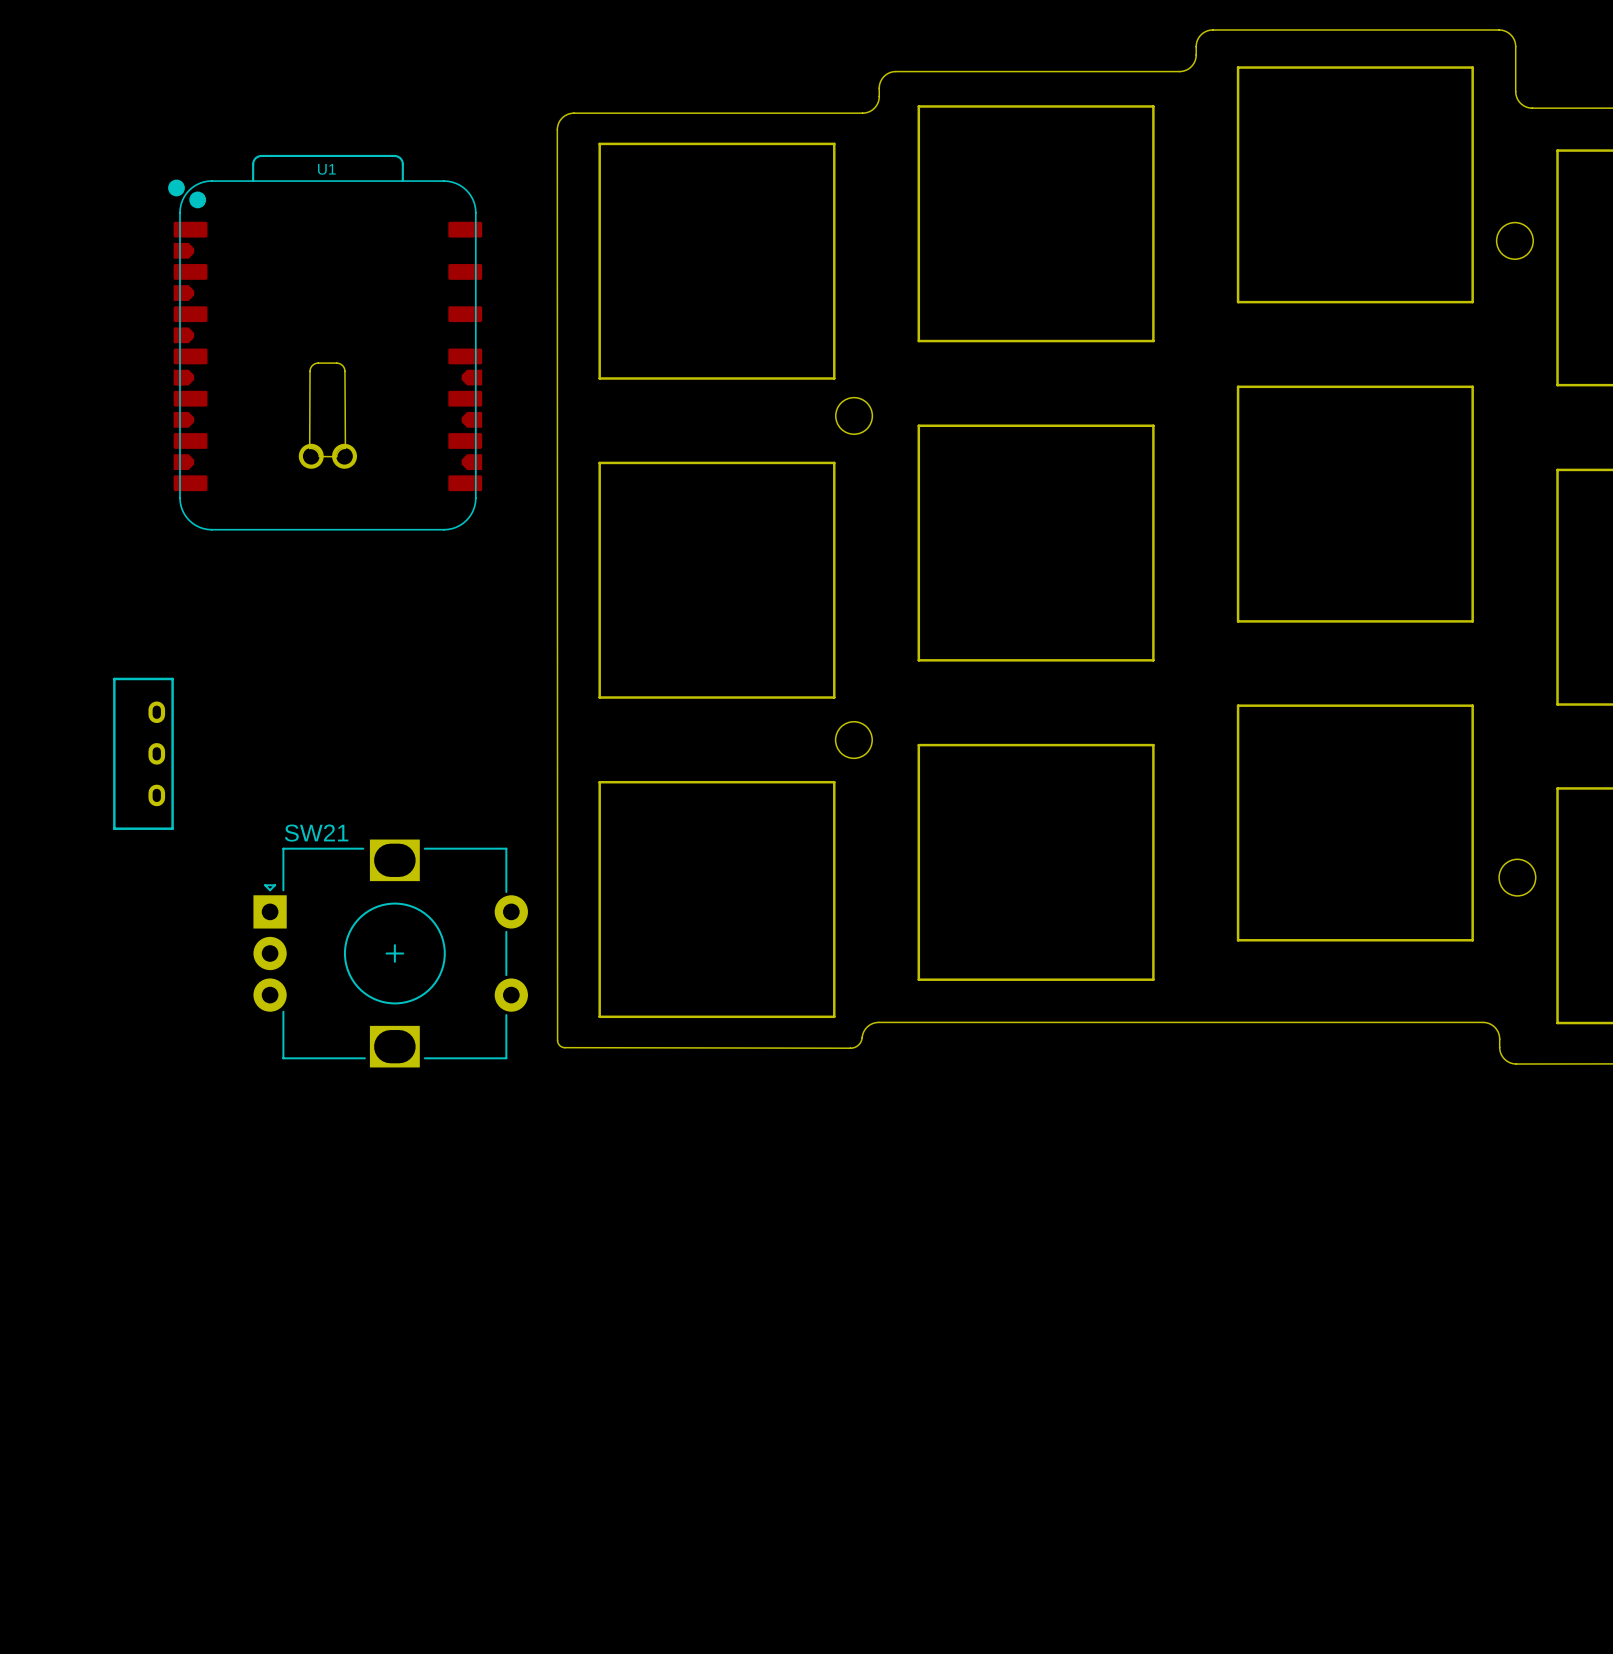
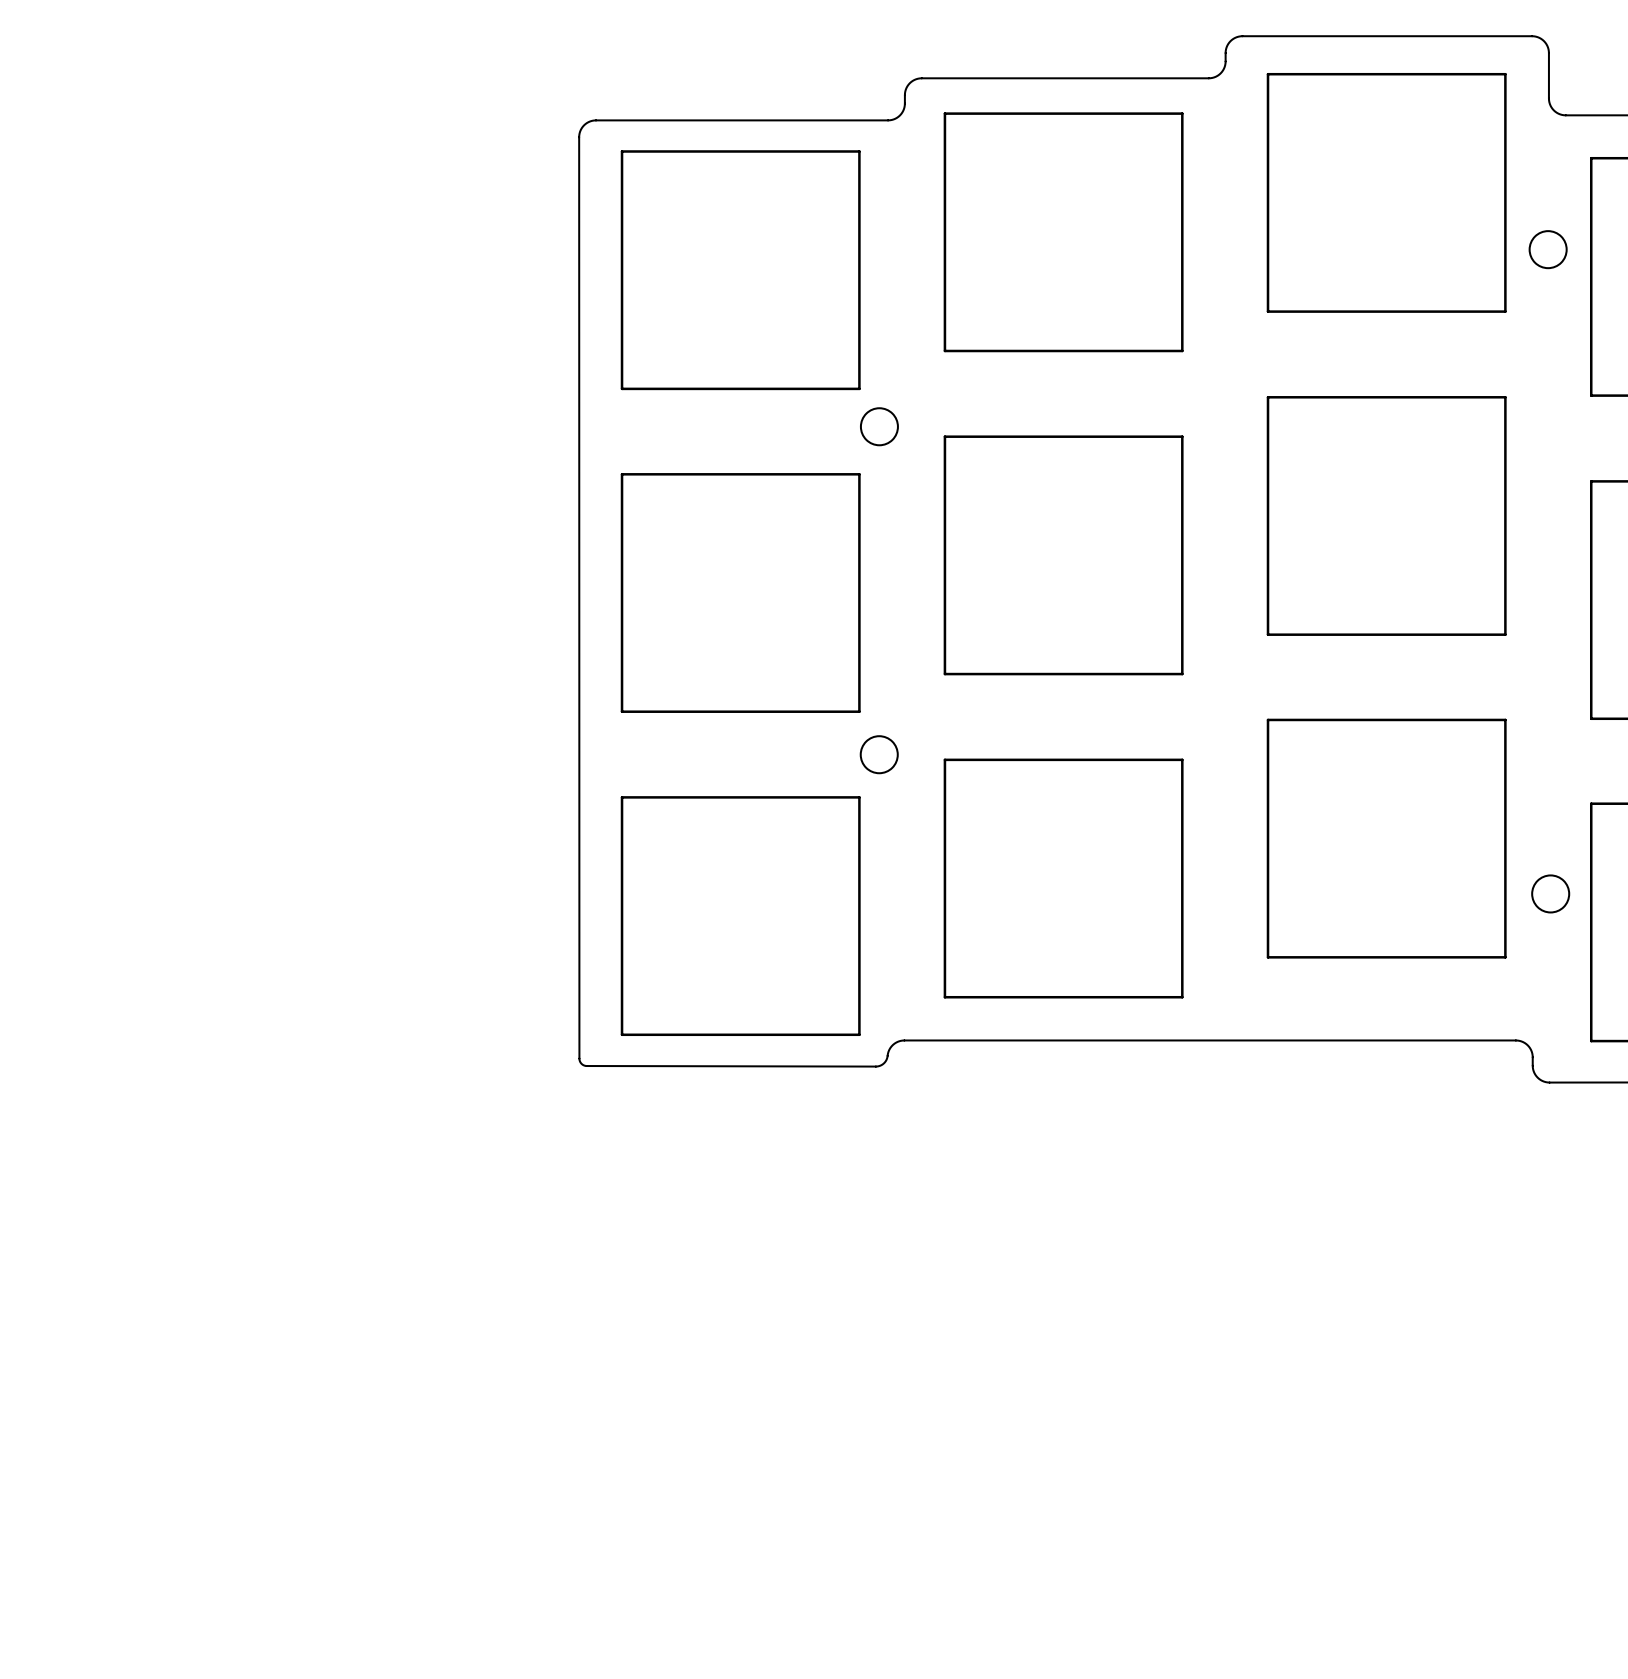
U1: (325, 342) -> none
part: (143, 753) -> none
SW21: (390, 953) -> none

